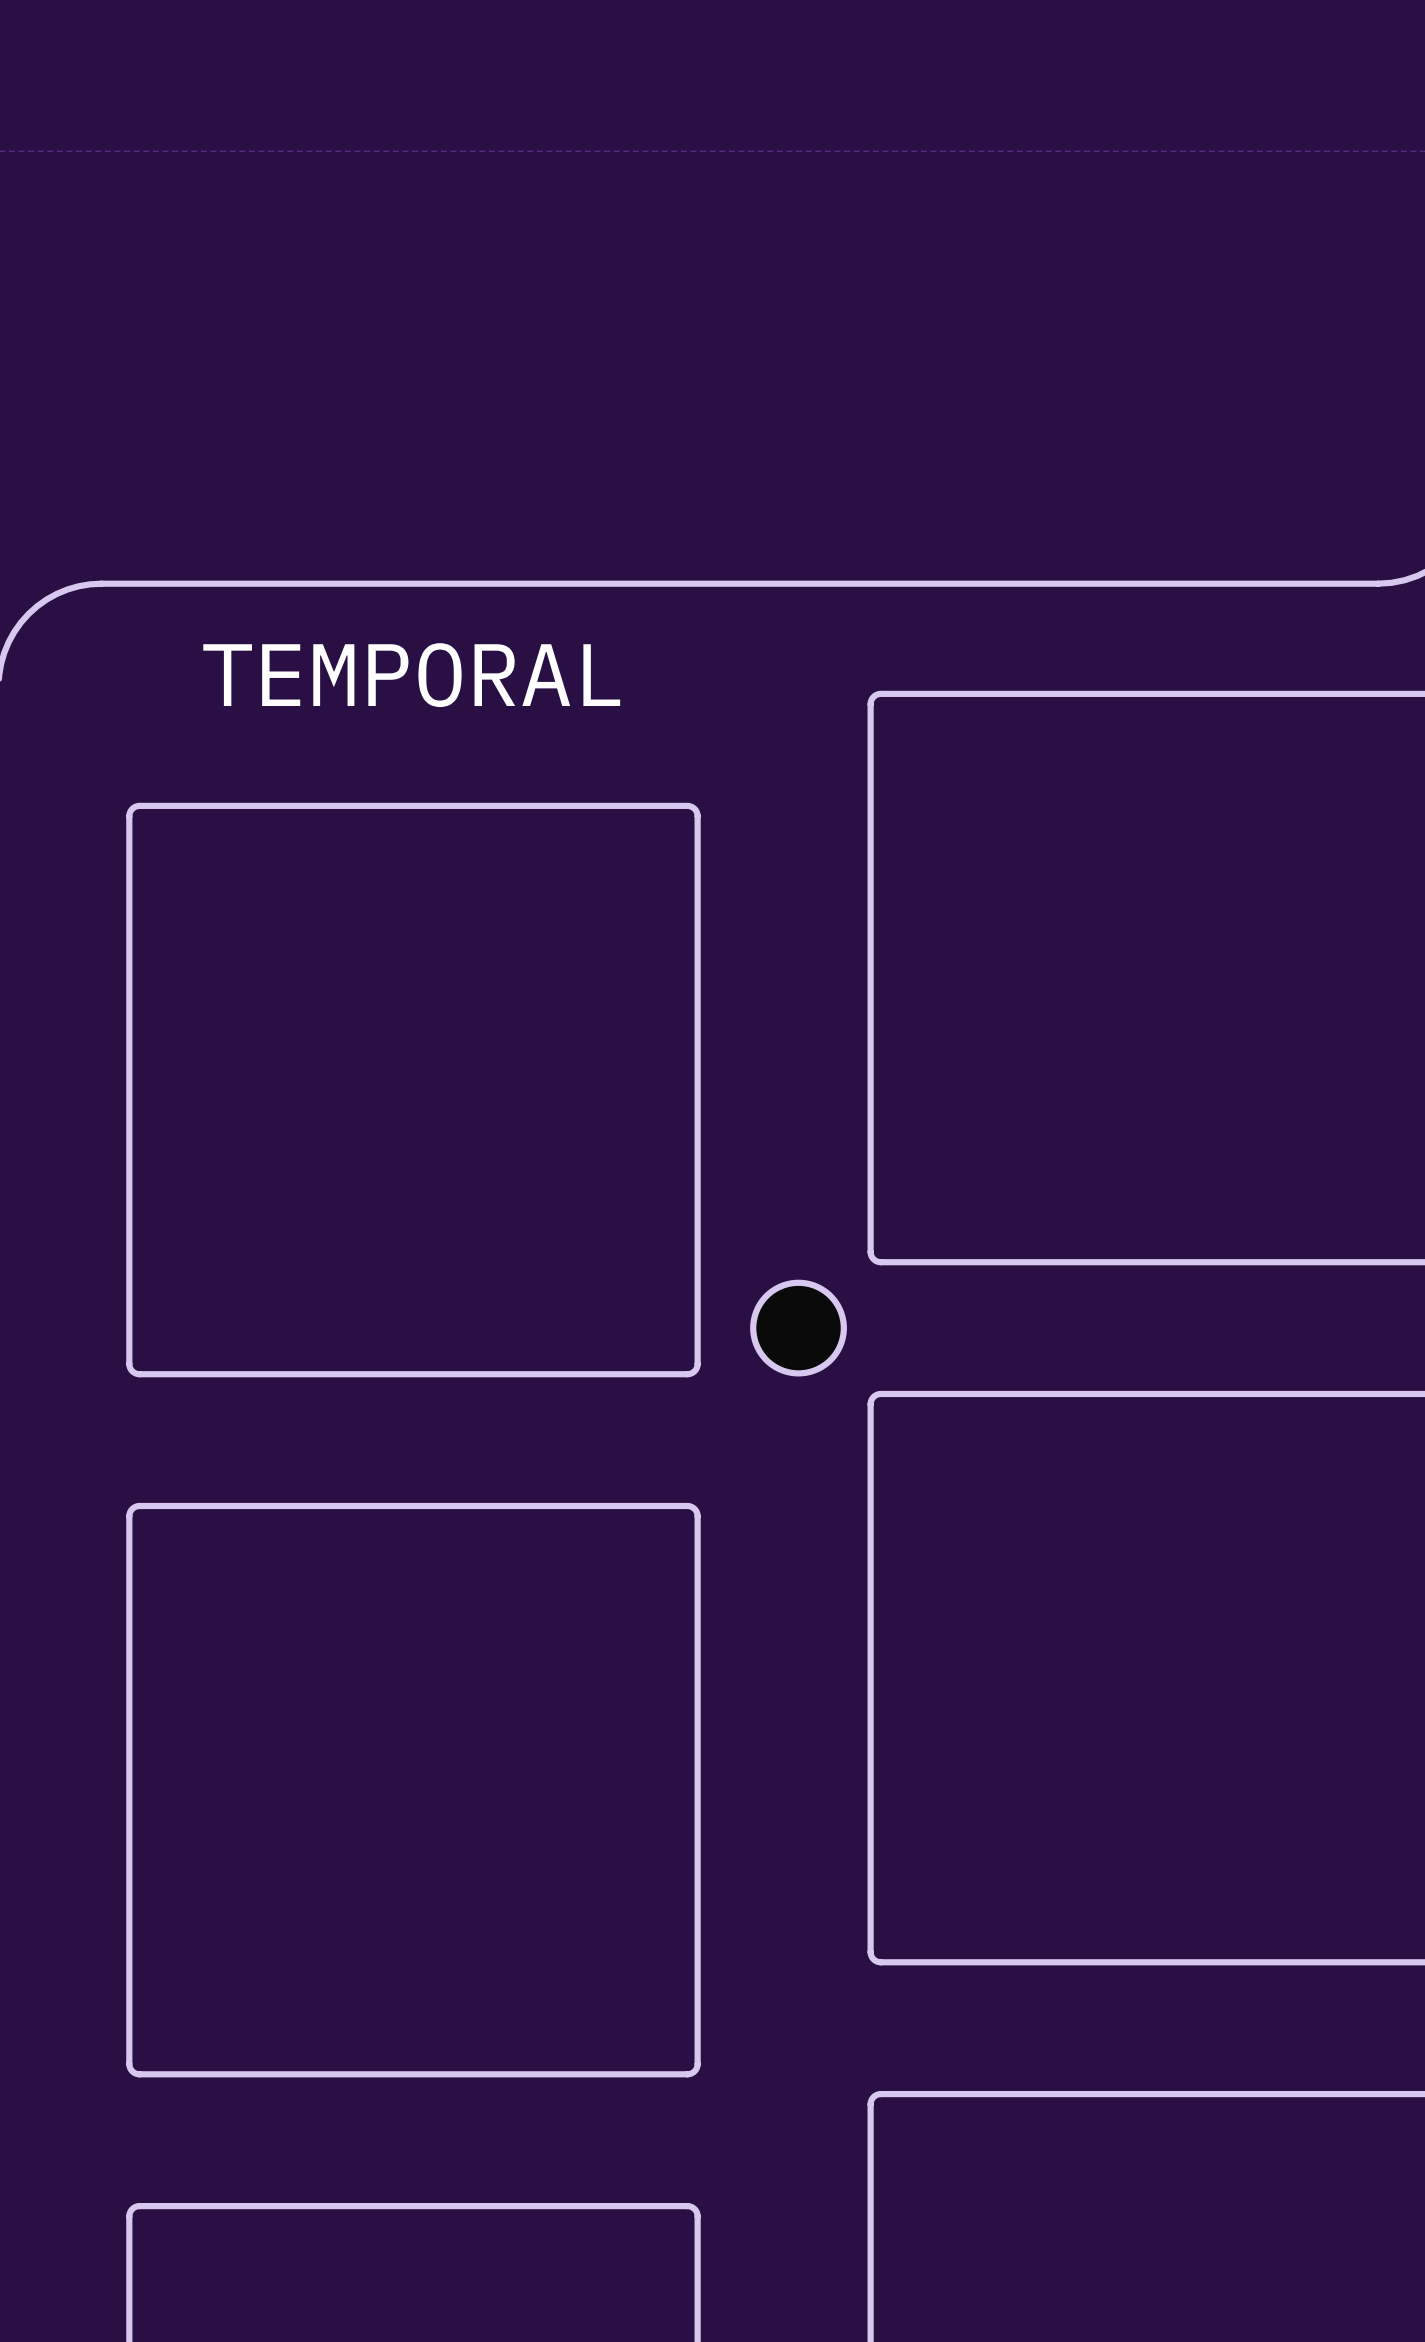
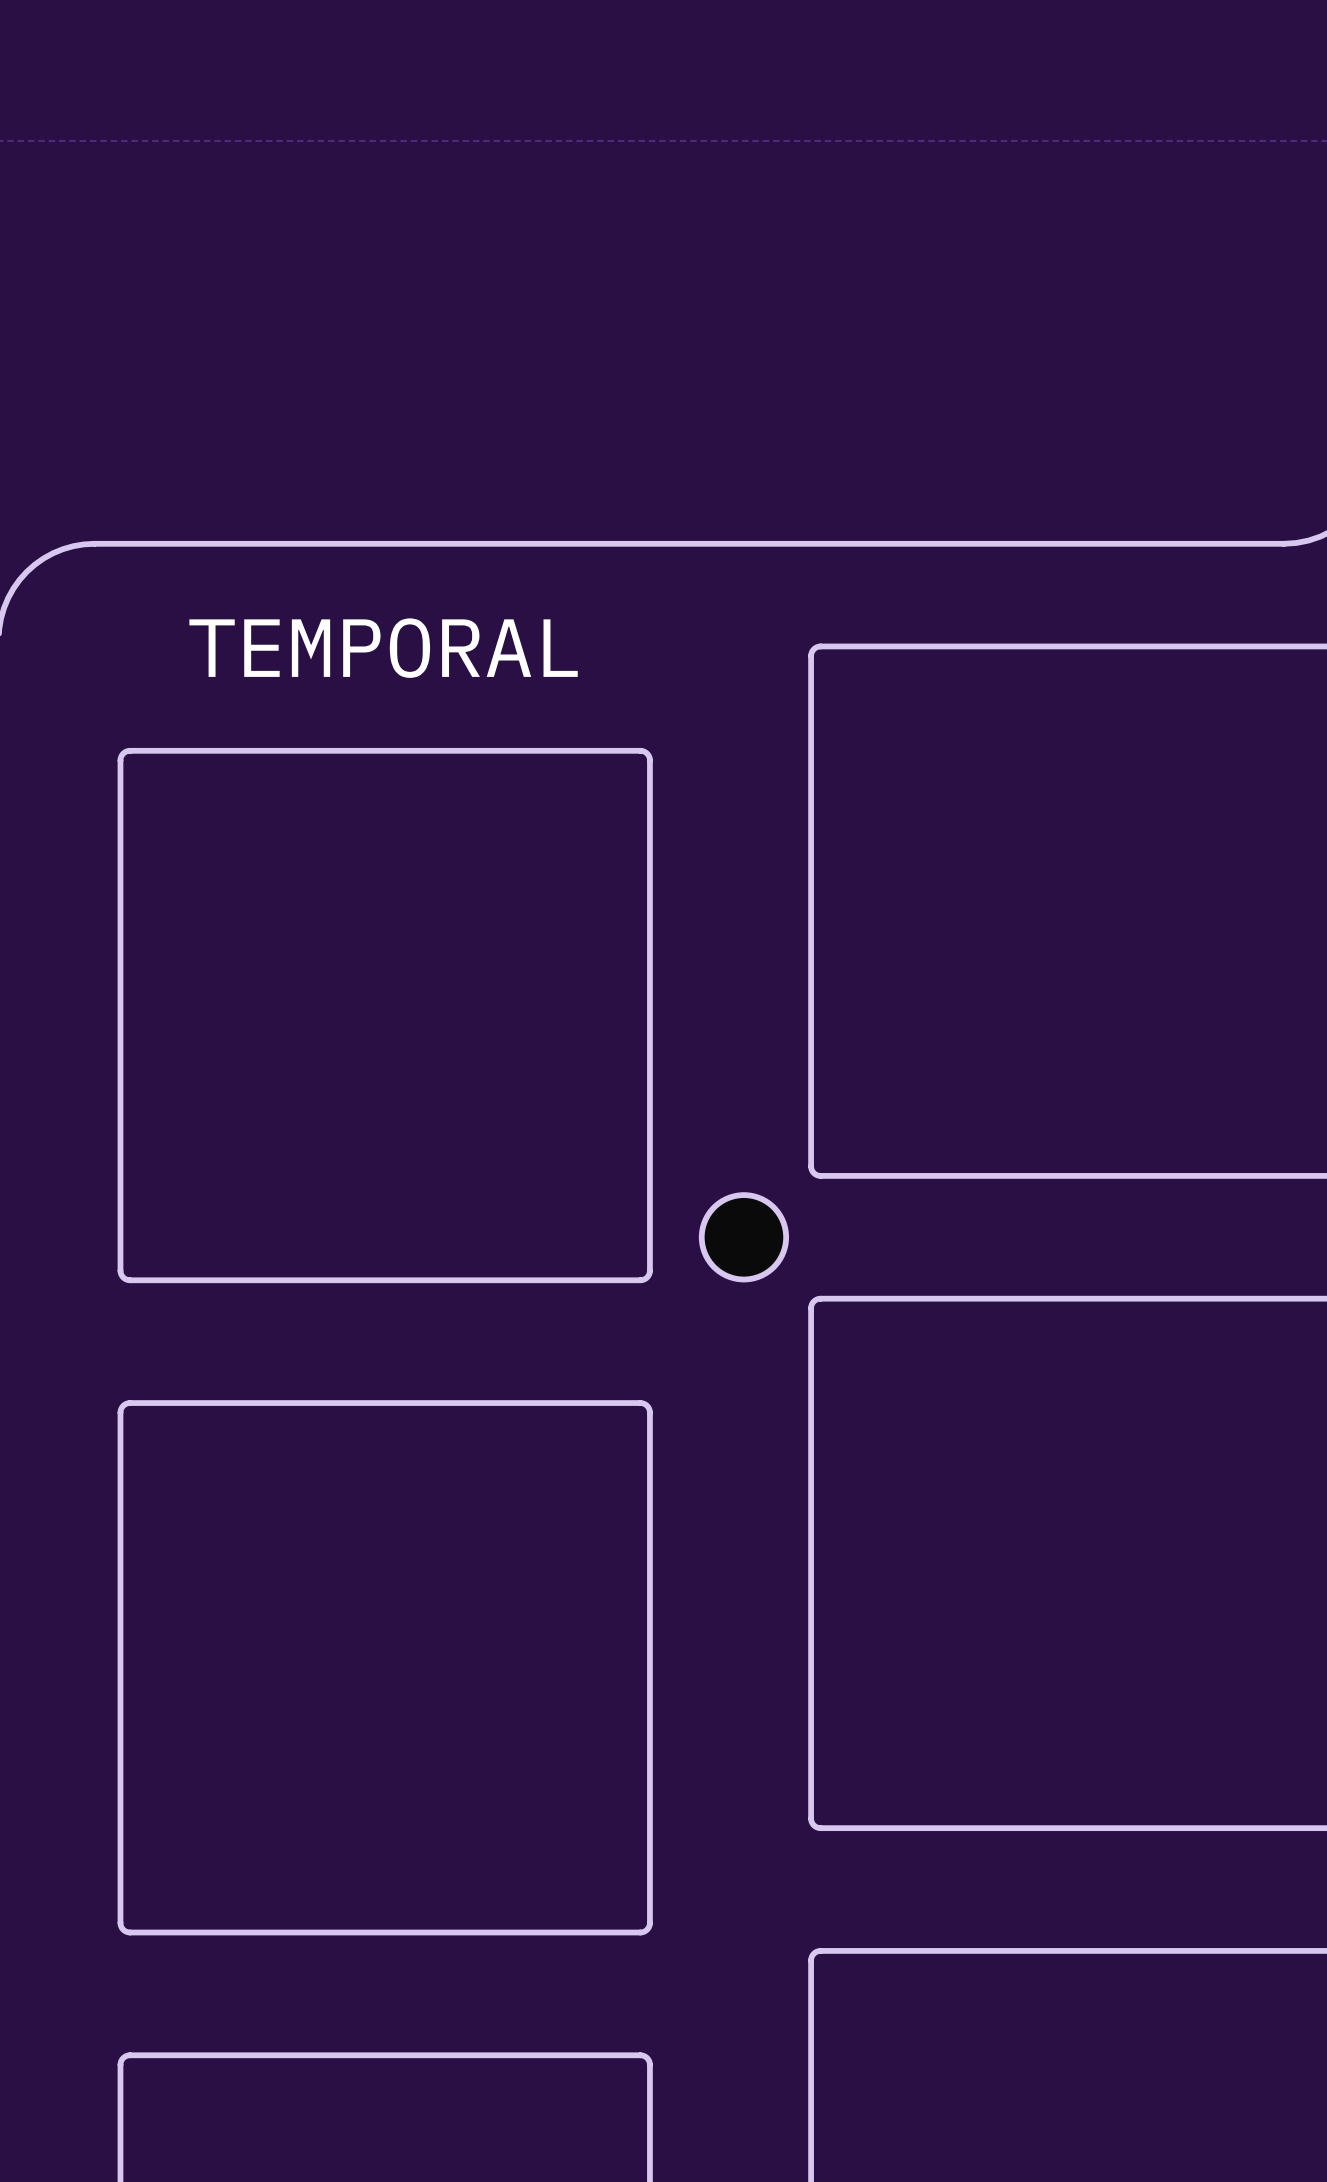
text position: TEMPORAL (411, 675) -> TEMPORAL (383, 648)

